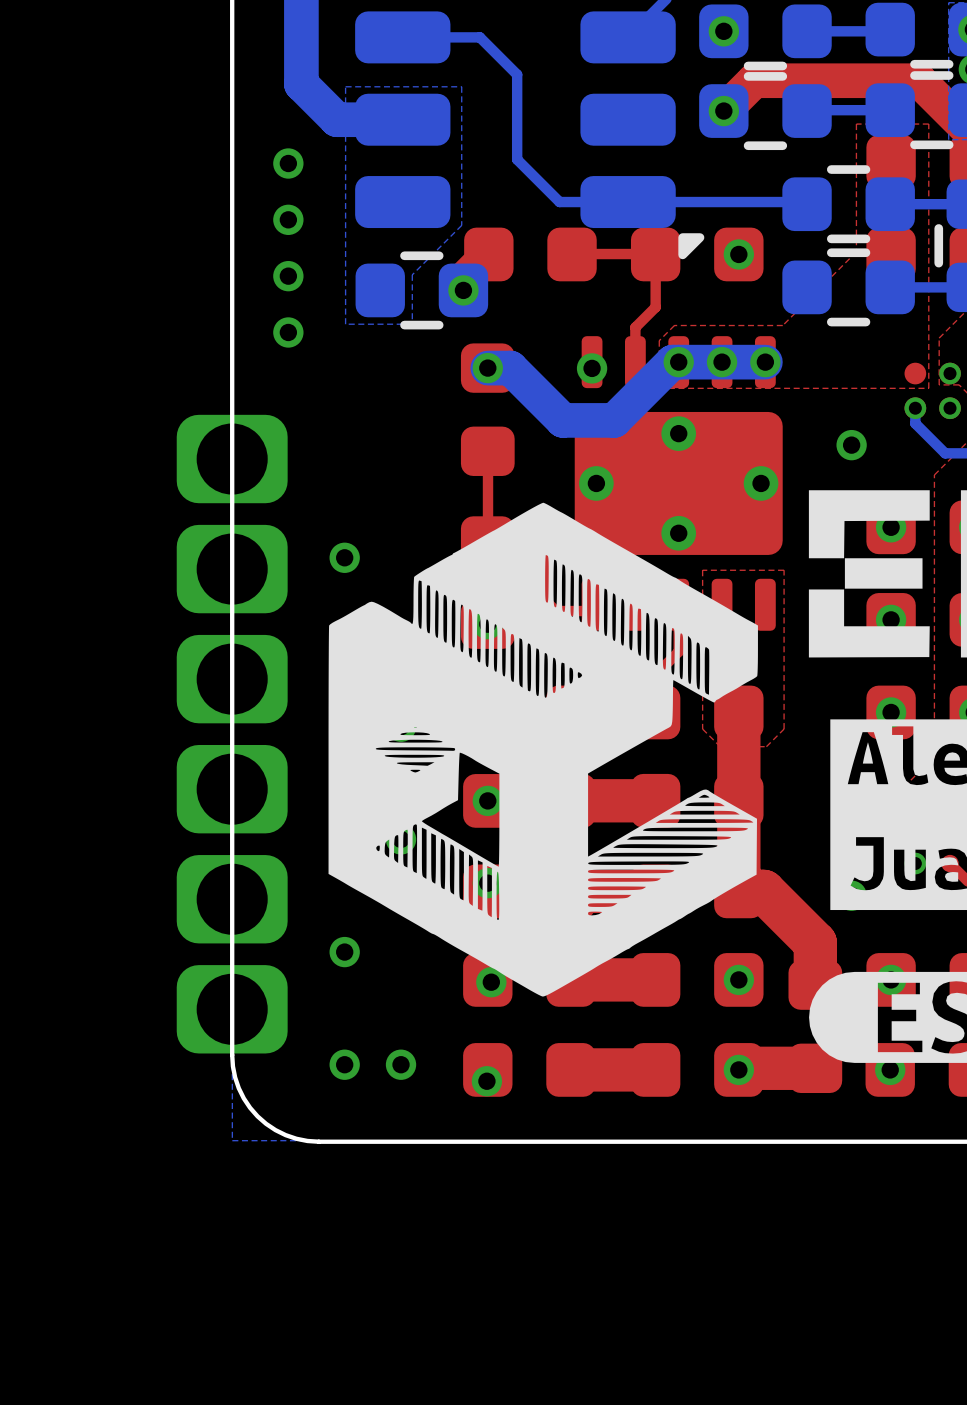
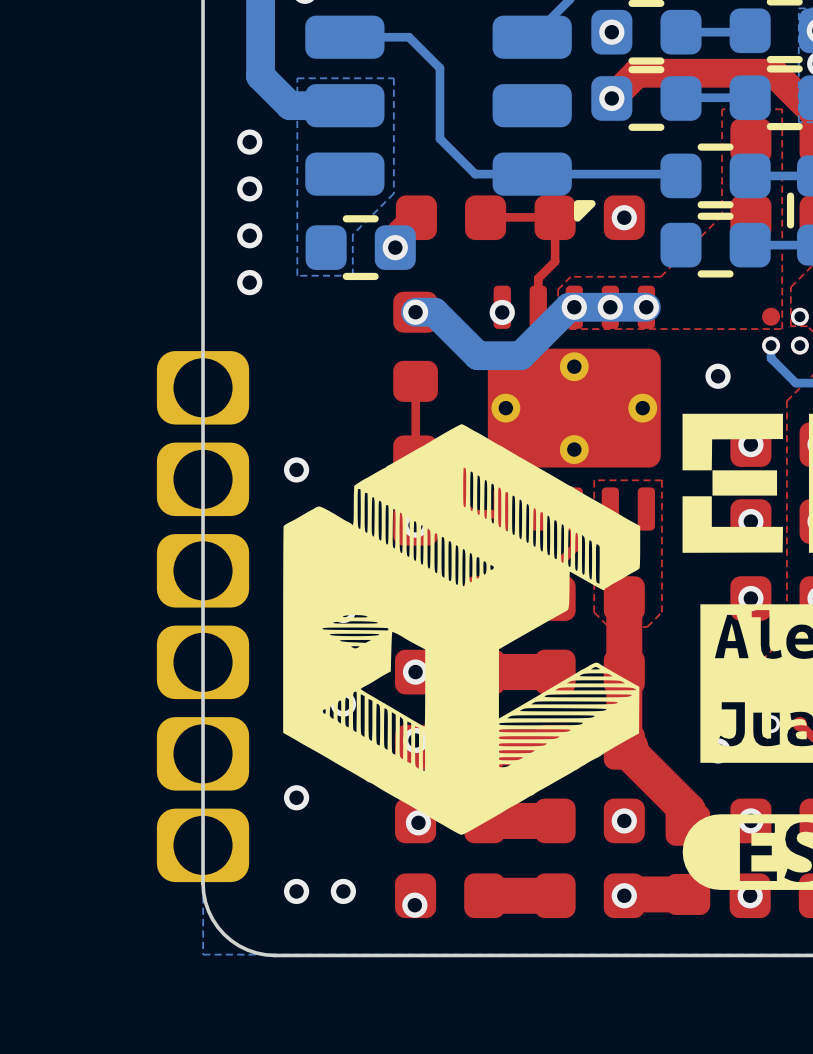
top track: (746, 891) (763, 891) (815, 943) (815, 967) -> (624, 747) (687, 810)

